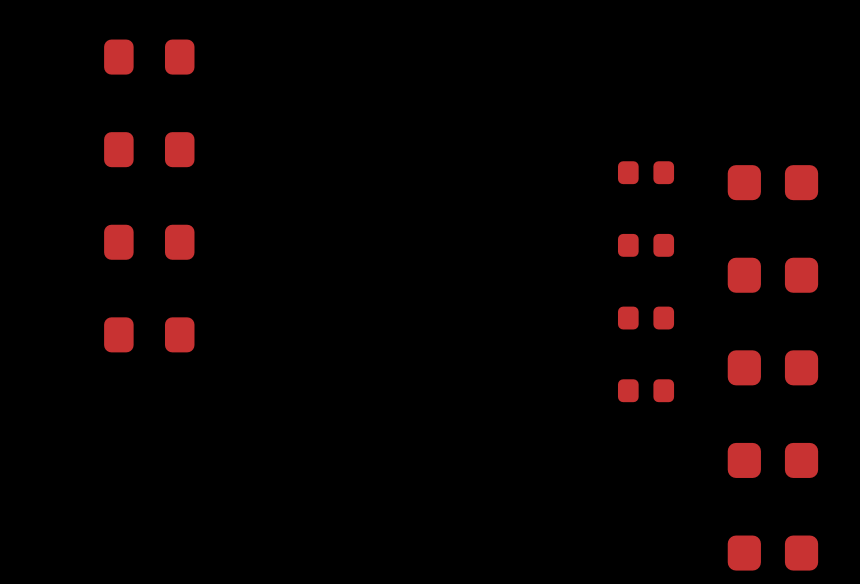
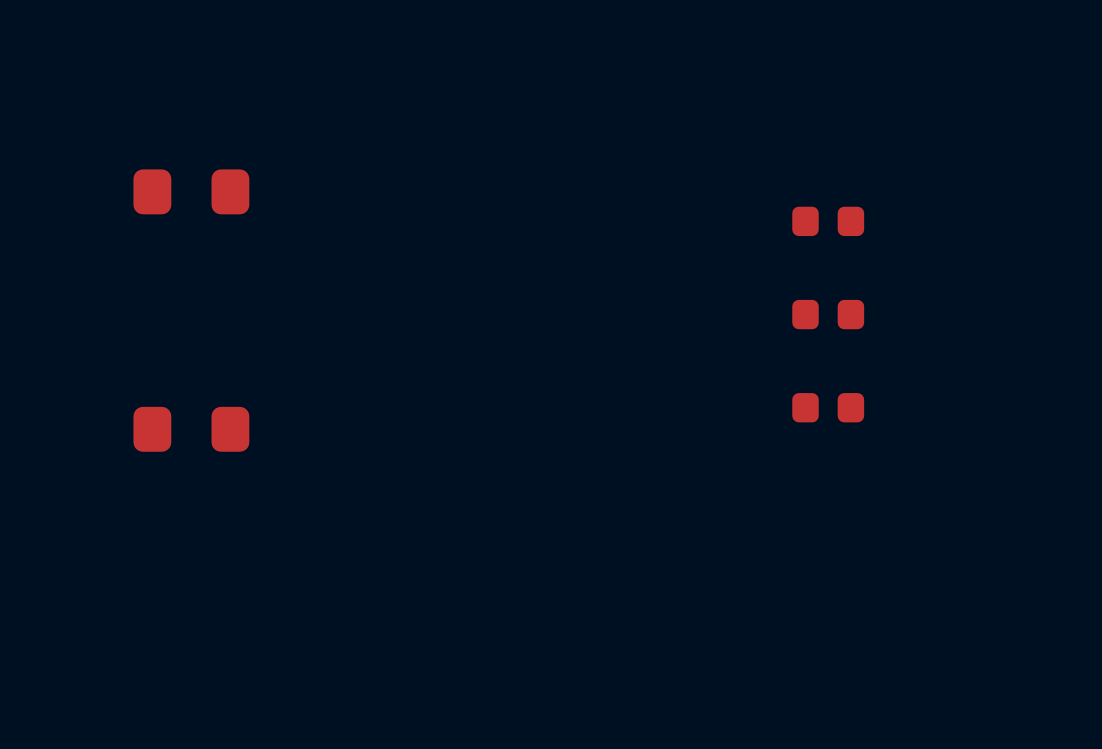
part: (149, 57) -> none
part: (772, 182) -> none
part: (149, 242) -> none
part: (772, 275) -> none
part: (772, 367) -> none
part: (646, 390) -> none
part: (772, 460) -> none
part: (772, 553) -> none

